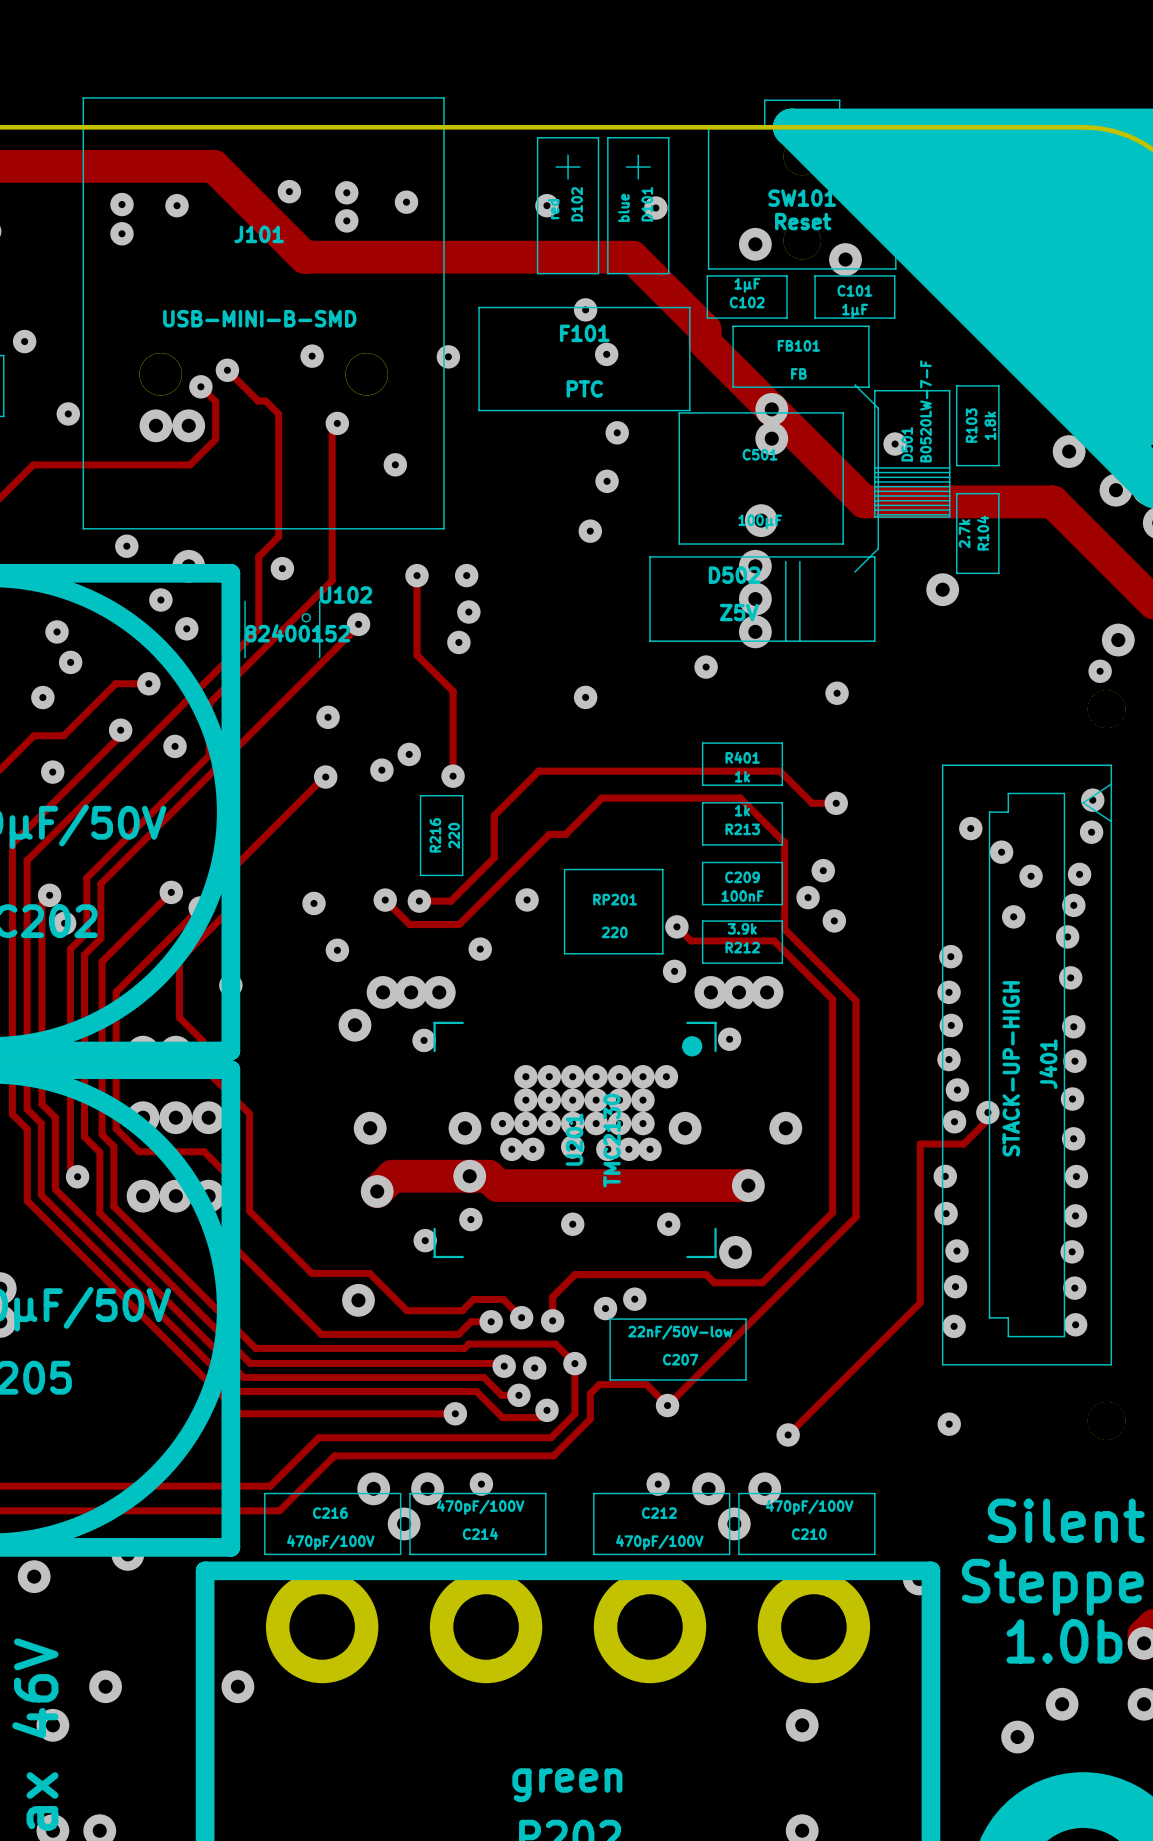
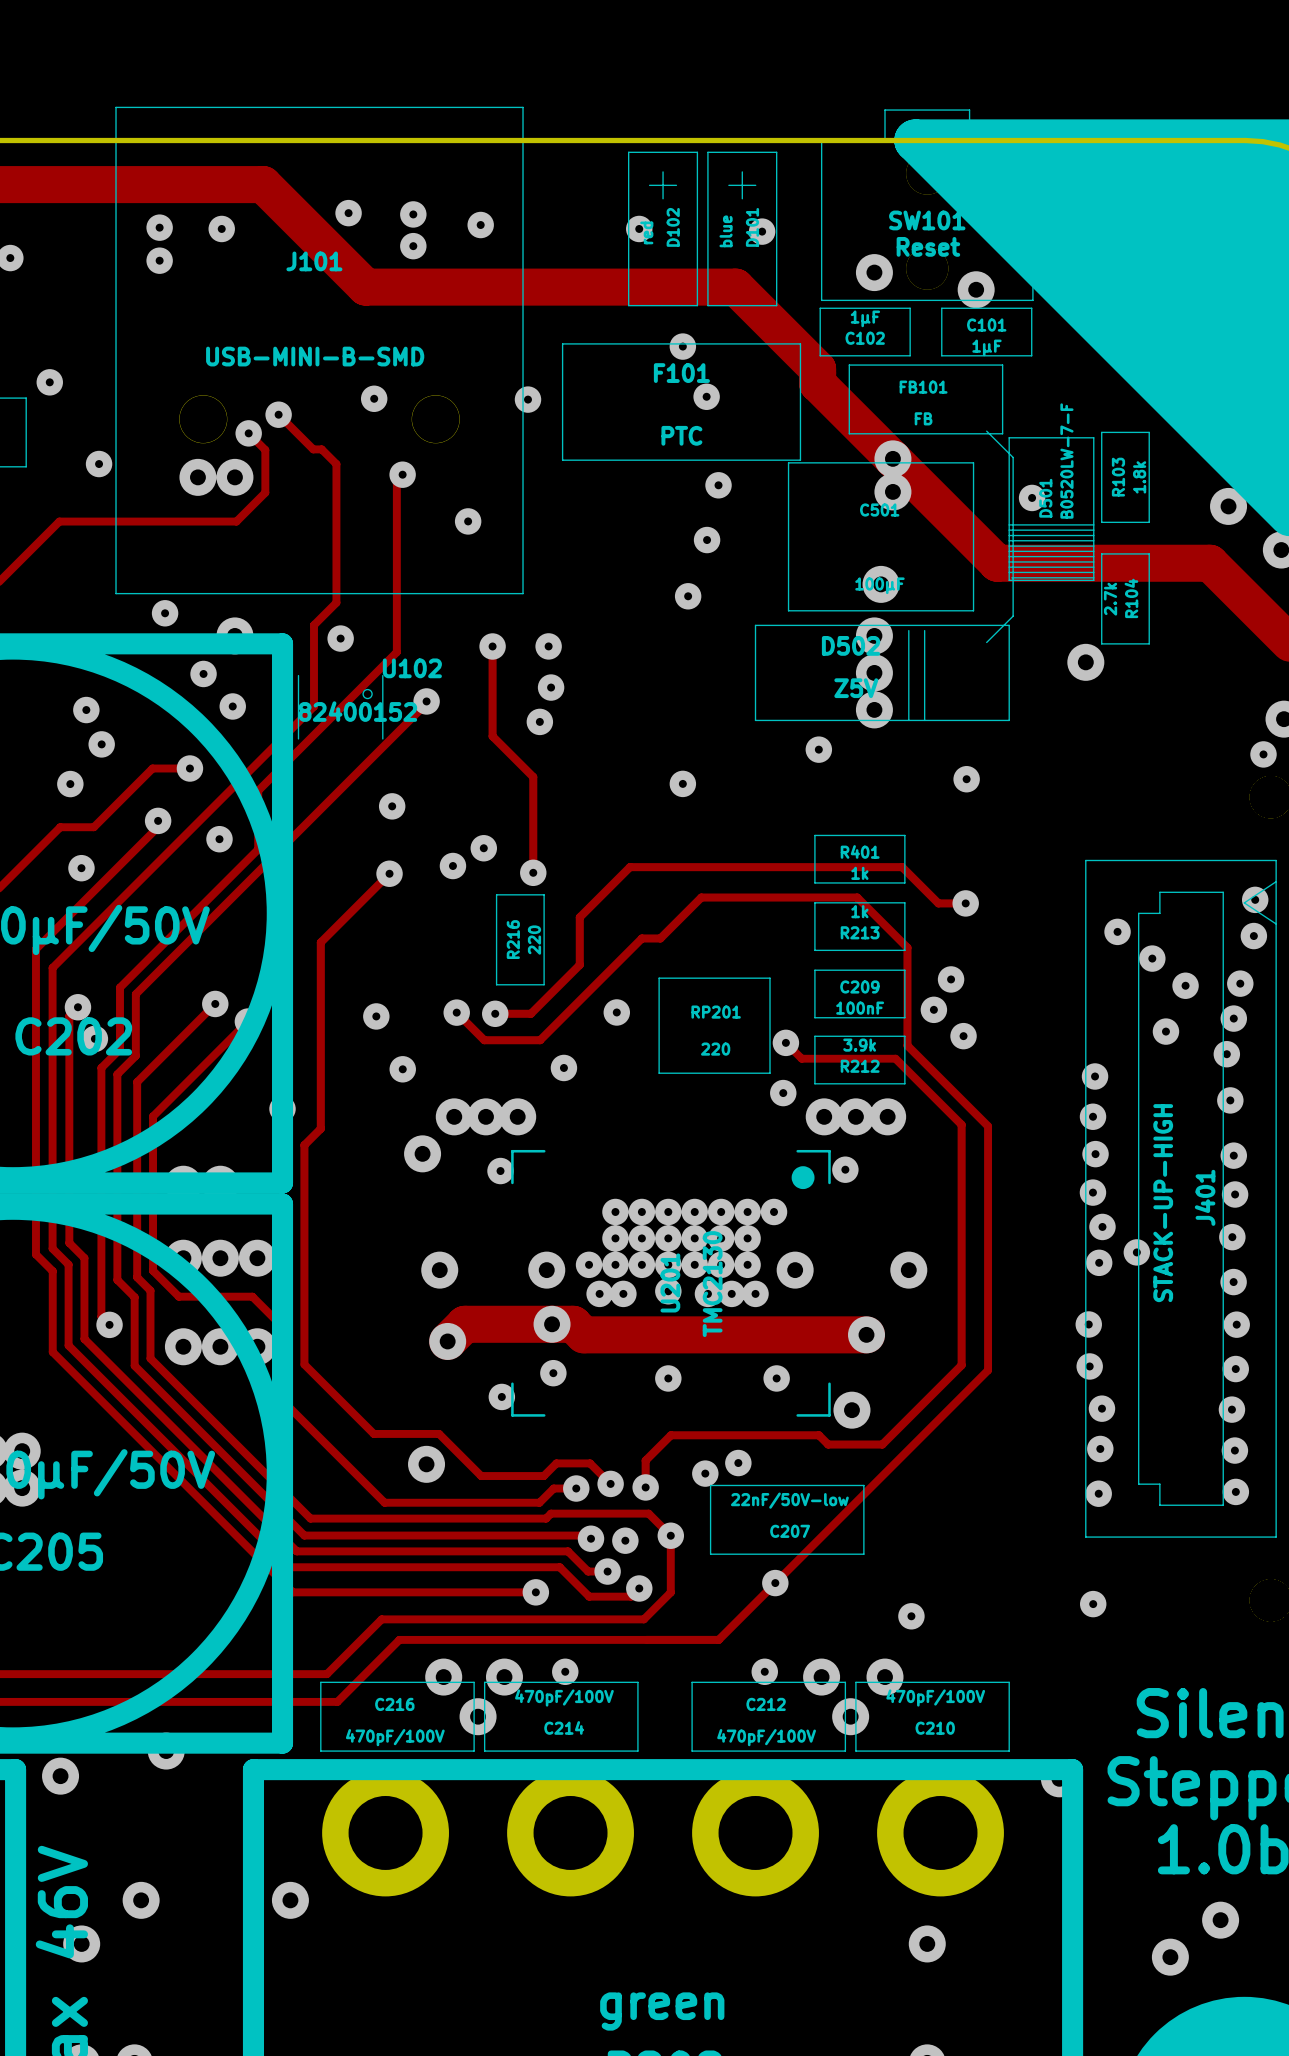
track: (325, 777) (230, 870) (230, 908) (179, 960) (179, 1017) (202, 1041) (202, 1067) (249, 1113) (250, 1211) -> (389, 873) (320, 942) (320, 1128) (304, 1145) (304, 1364)
track: (987, 1119) (963, 1144) (920, 1144) (920, 1302) (788, 1434) -> none
track: (667, 1405) (646, 1384) (599, 1384) (590, 1393) (590, 1419) (553, 1455) -> (775, 1583) (718, 1639) (646, 1639)

